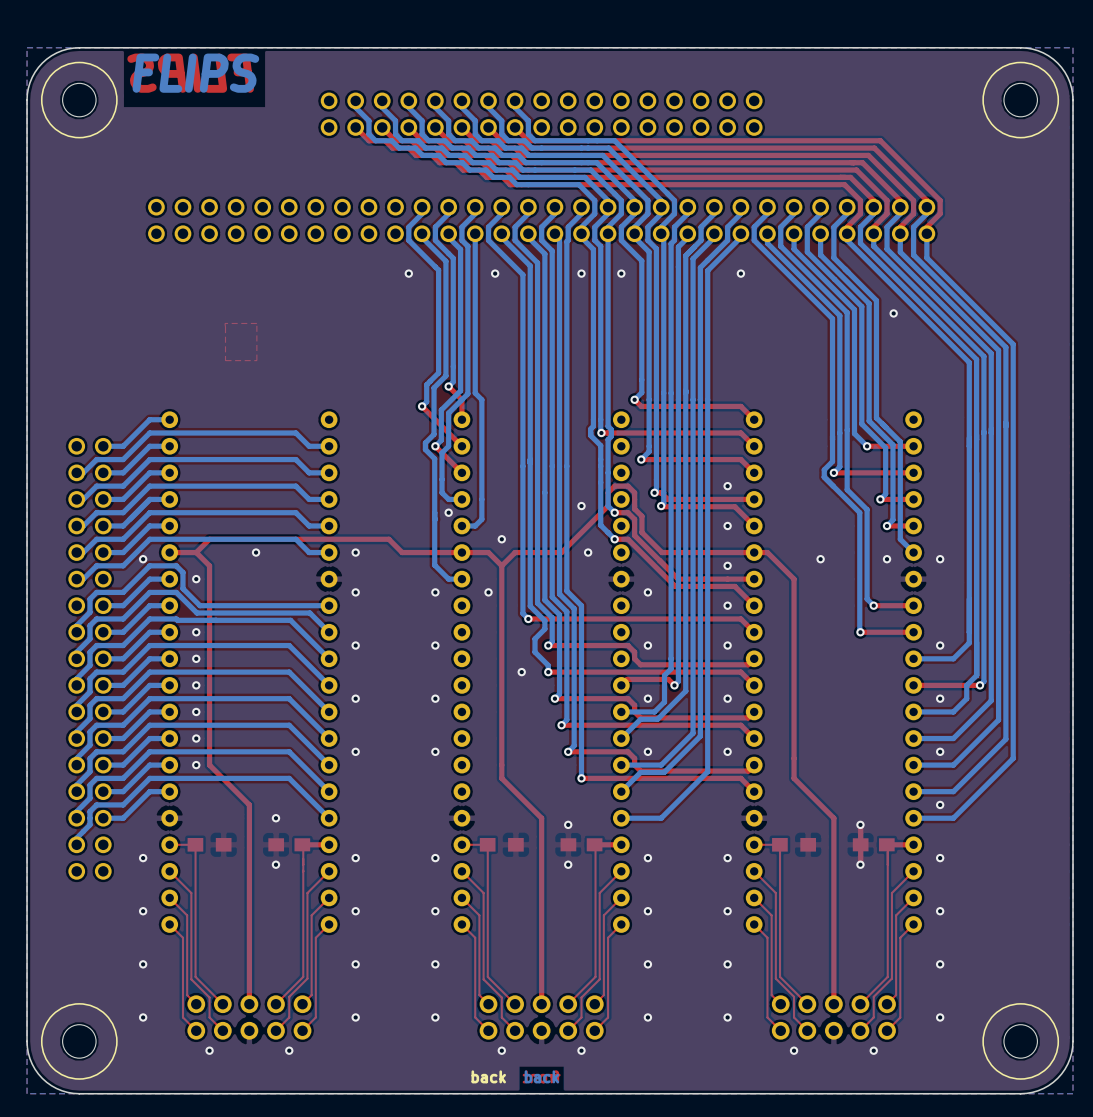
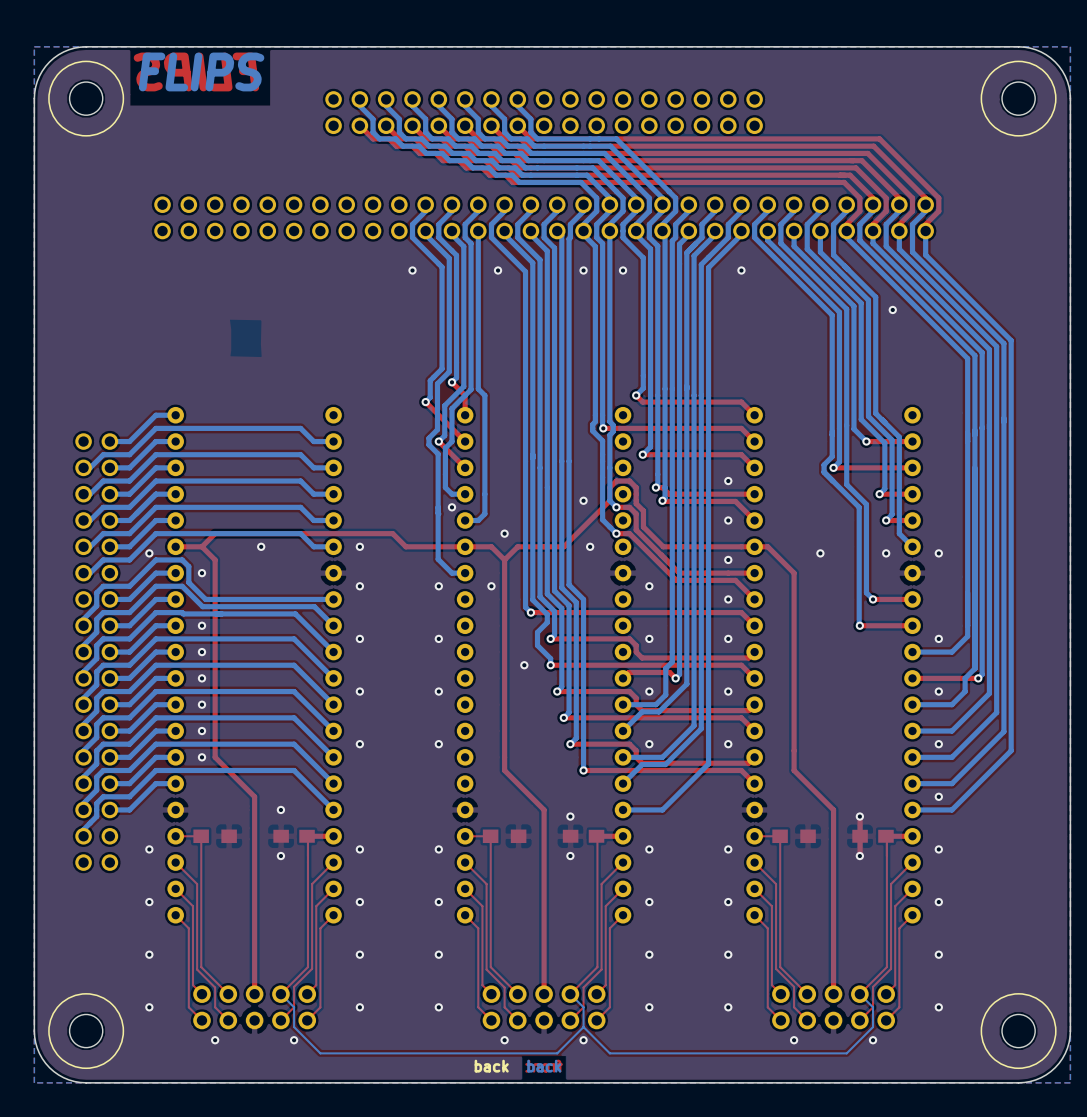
top zone outline: (256, 323) (256, 360) (225, 360) (224, 323) (256, 323) -> none
bottom track: none -> (280, 994) (294, 1007) (294, 1027) (320, 1053) (557, 1053) (583, 1027)
bottom track: none -> (570, 994) (583, 1007) (583, 1027)
bottom track: none -> (859, 994) (873, 1007) (873, 1027) (846, 1053) (609, 1053) (583, 1027)

